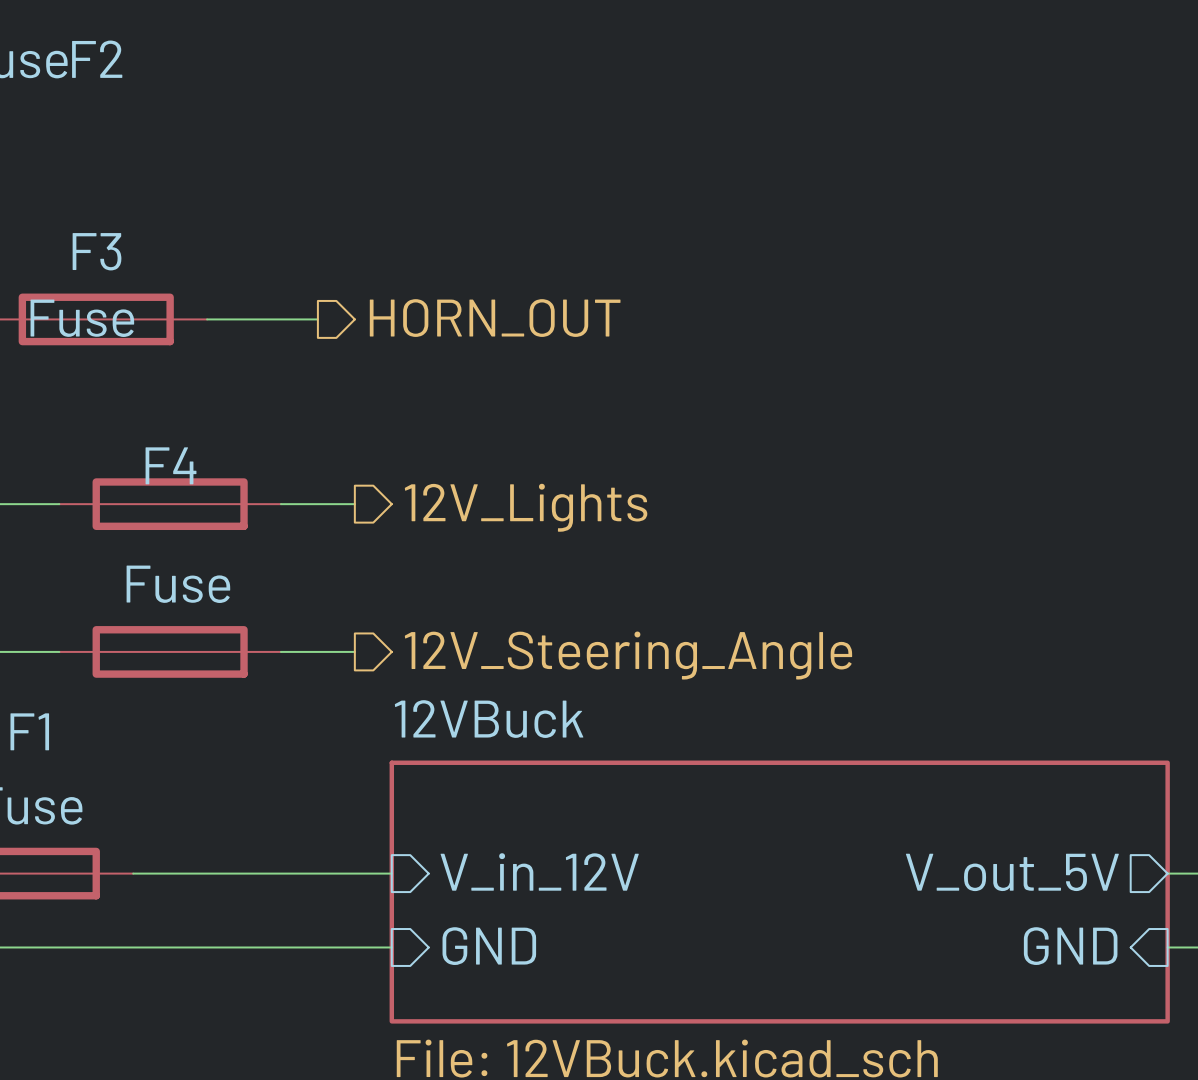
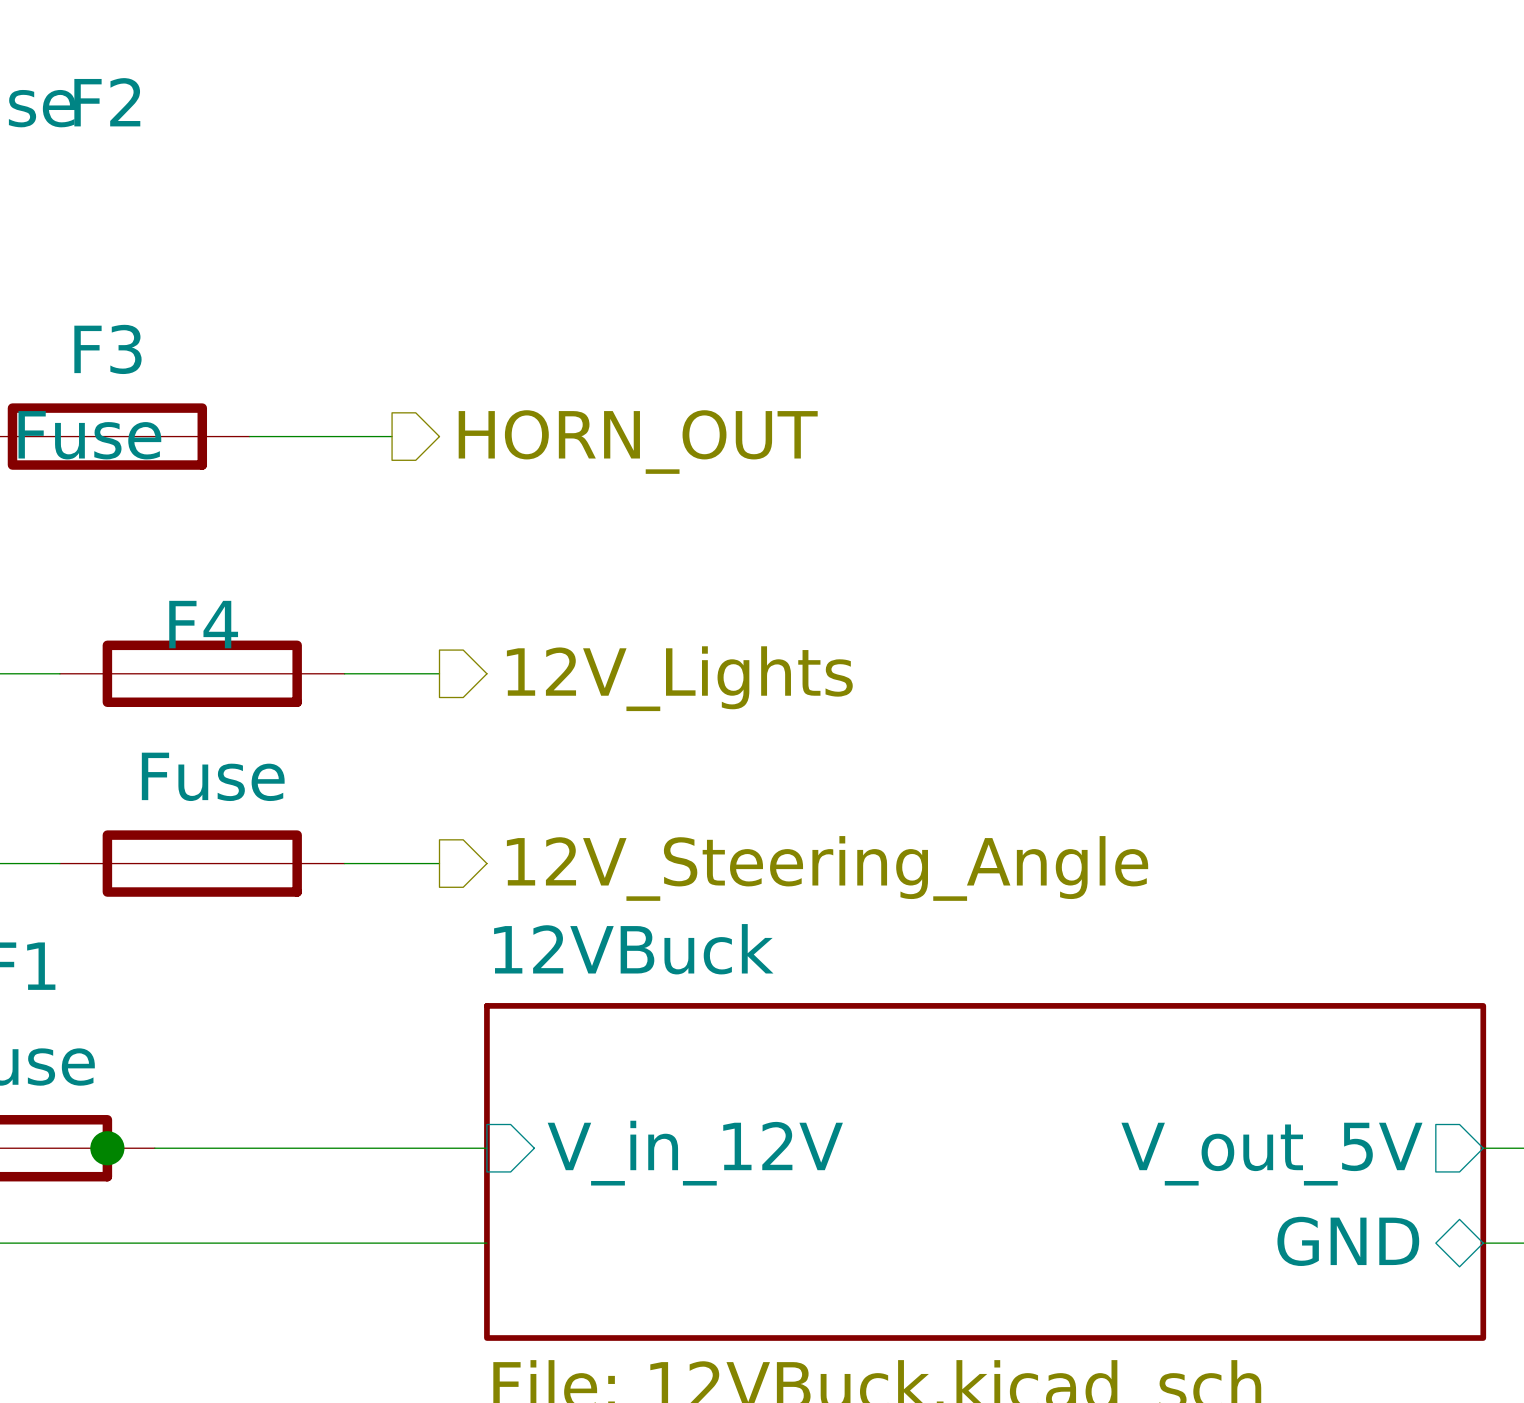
junction: none -> (107, 1148)
sheet pin: GND (489, 946) -> none
sheet pin shape: input (1070, 946) -> bidirectional (1348, 1241)

